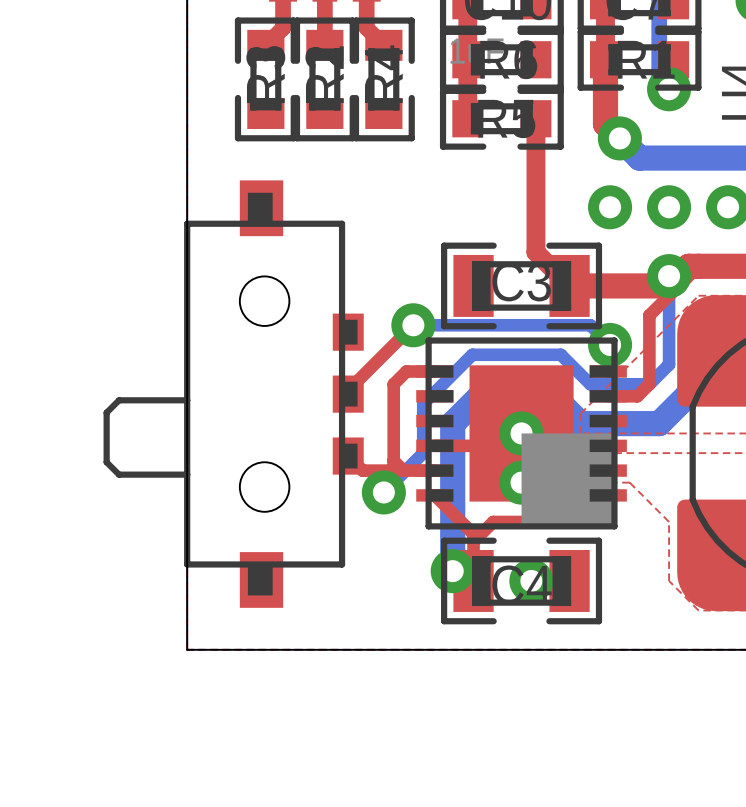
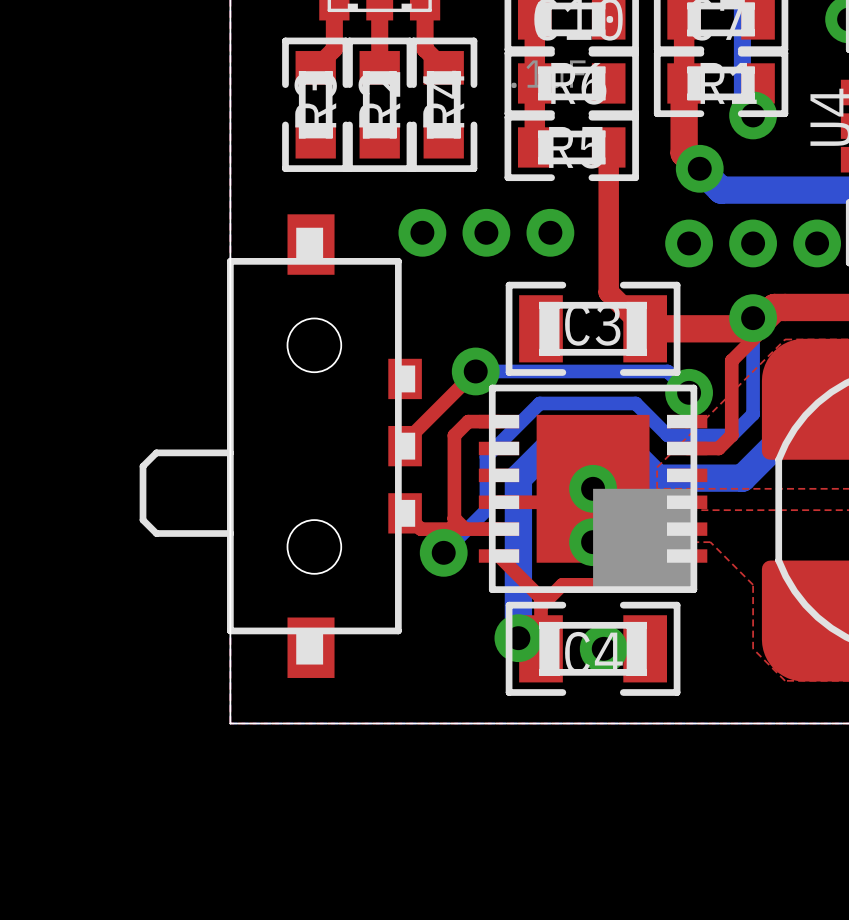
via: none -> (422, 232)
via: none -> (486, 232)
via: none -> (550, 232)

